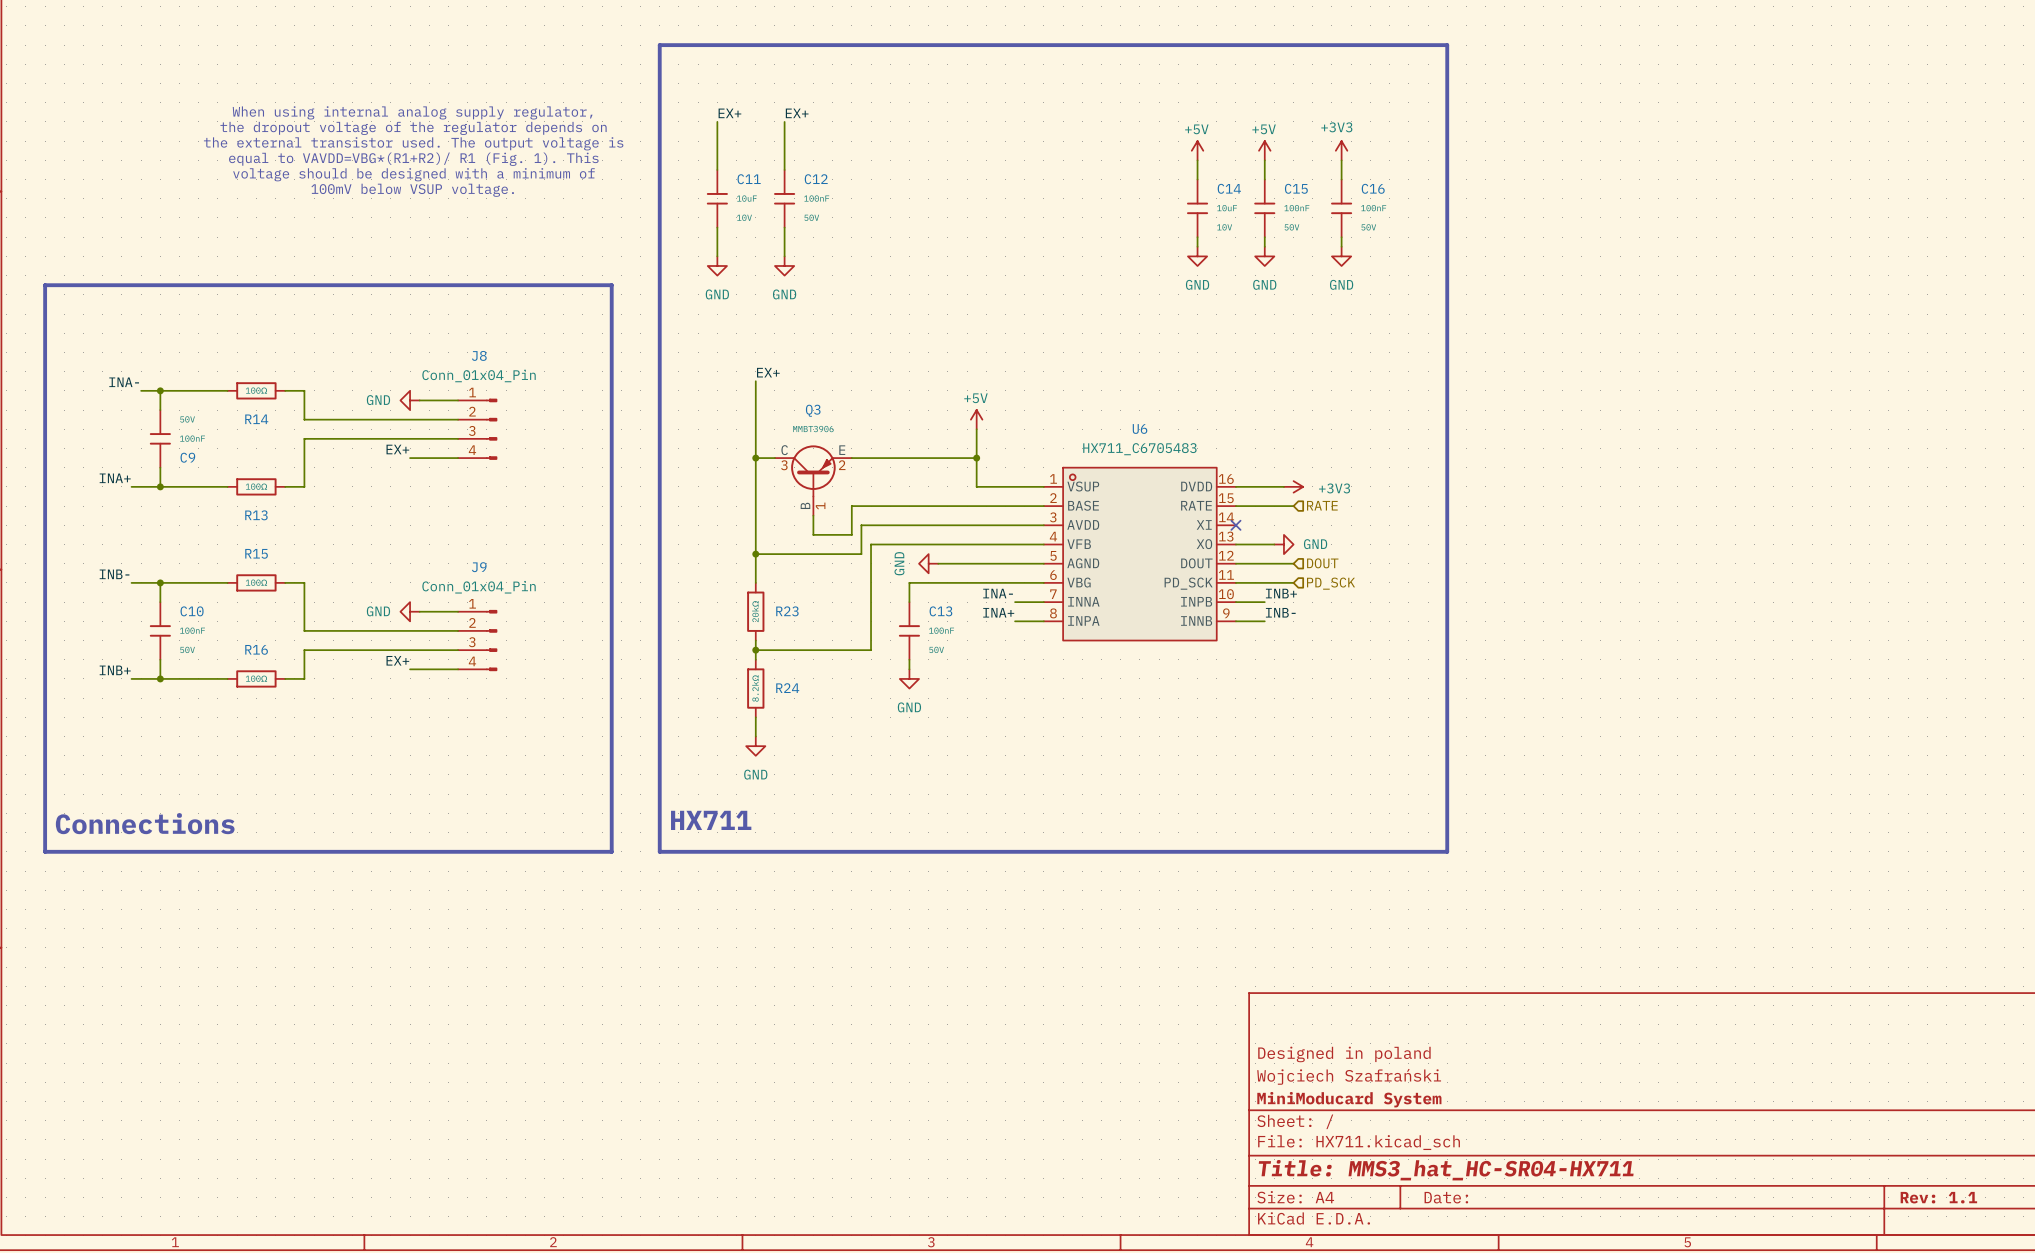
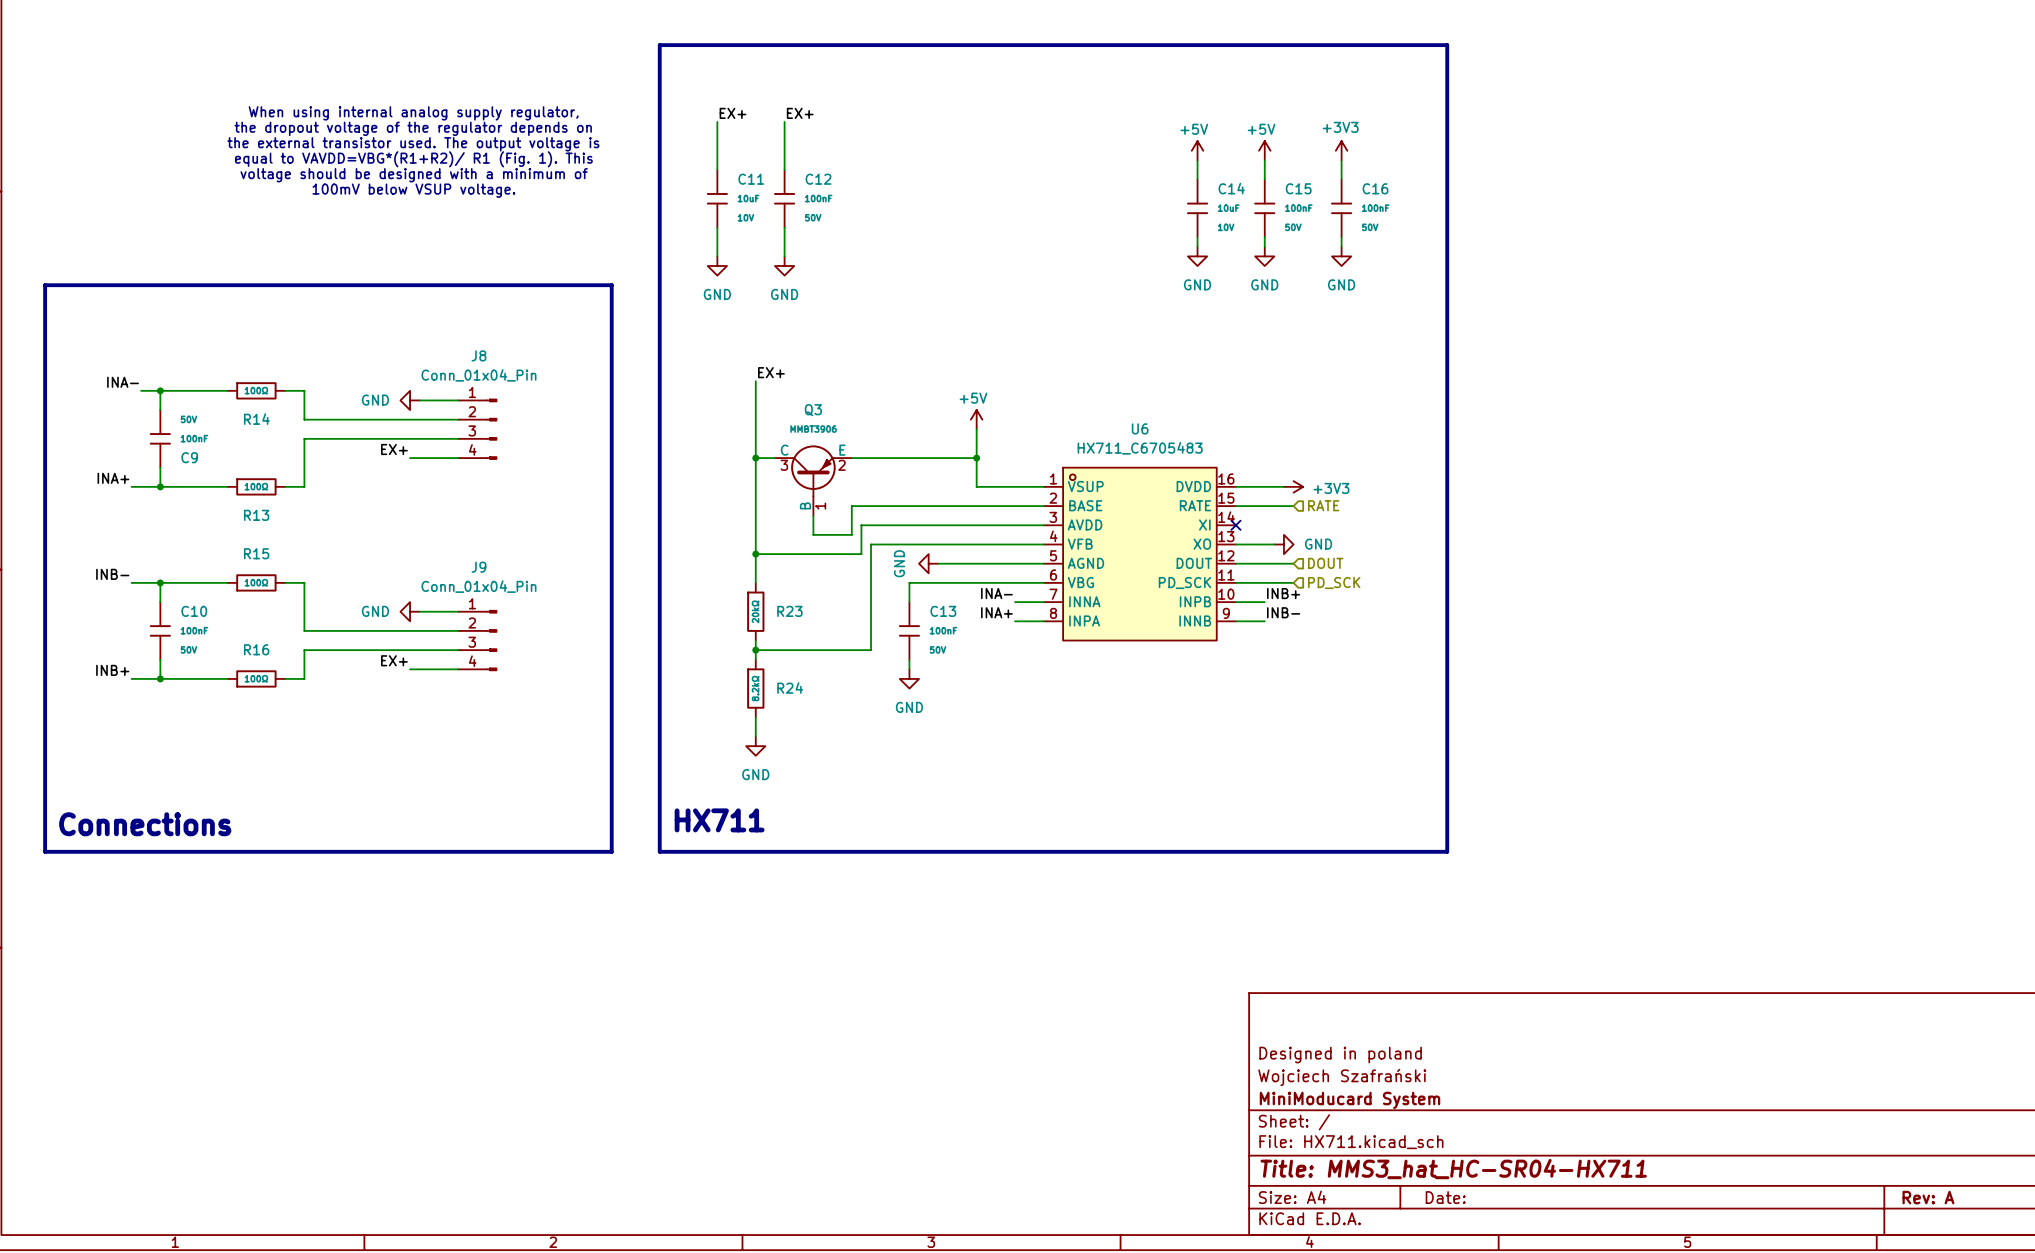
title block: Rev: 1.1 (1938, 1197) -> Rev: A (1928, 1197)

